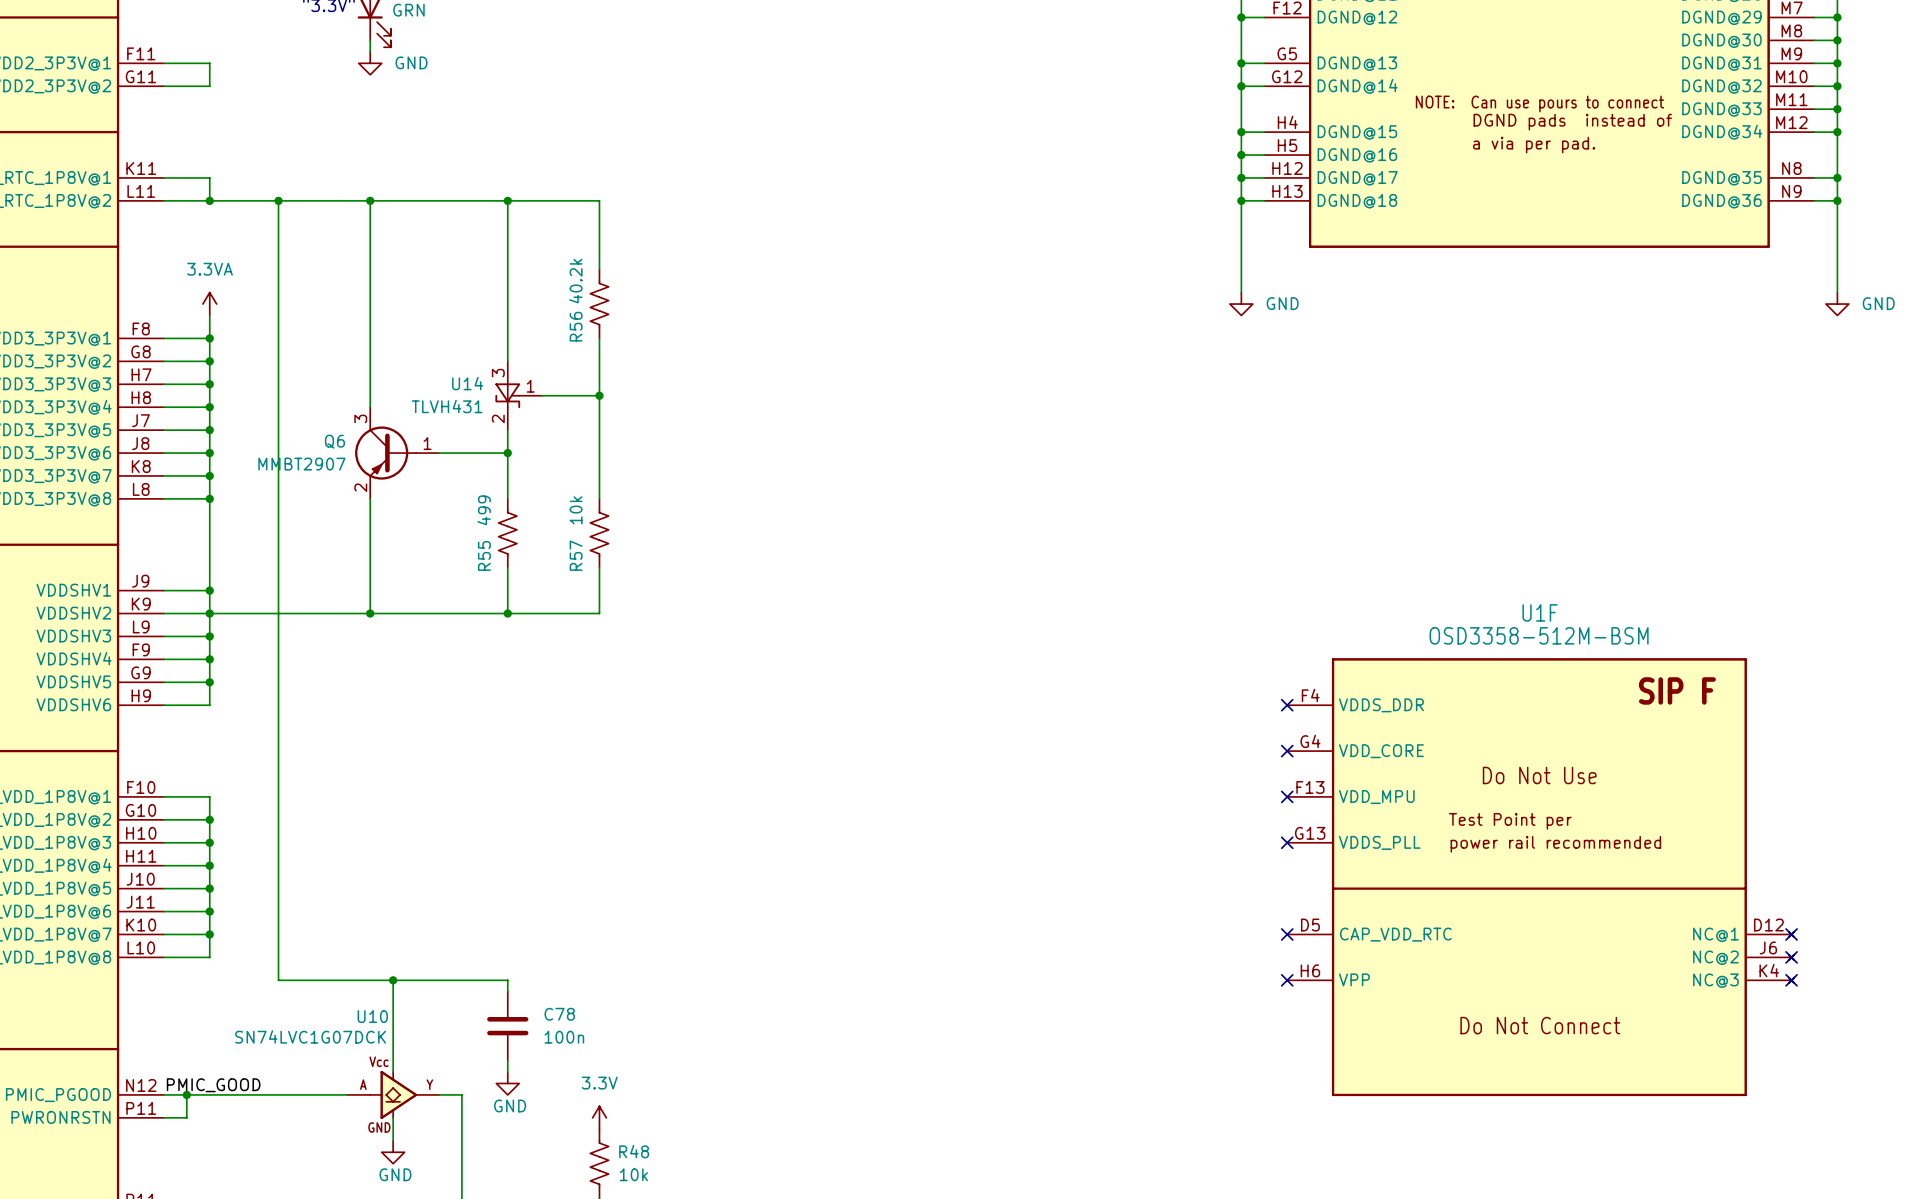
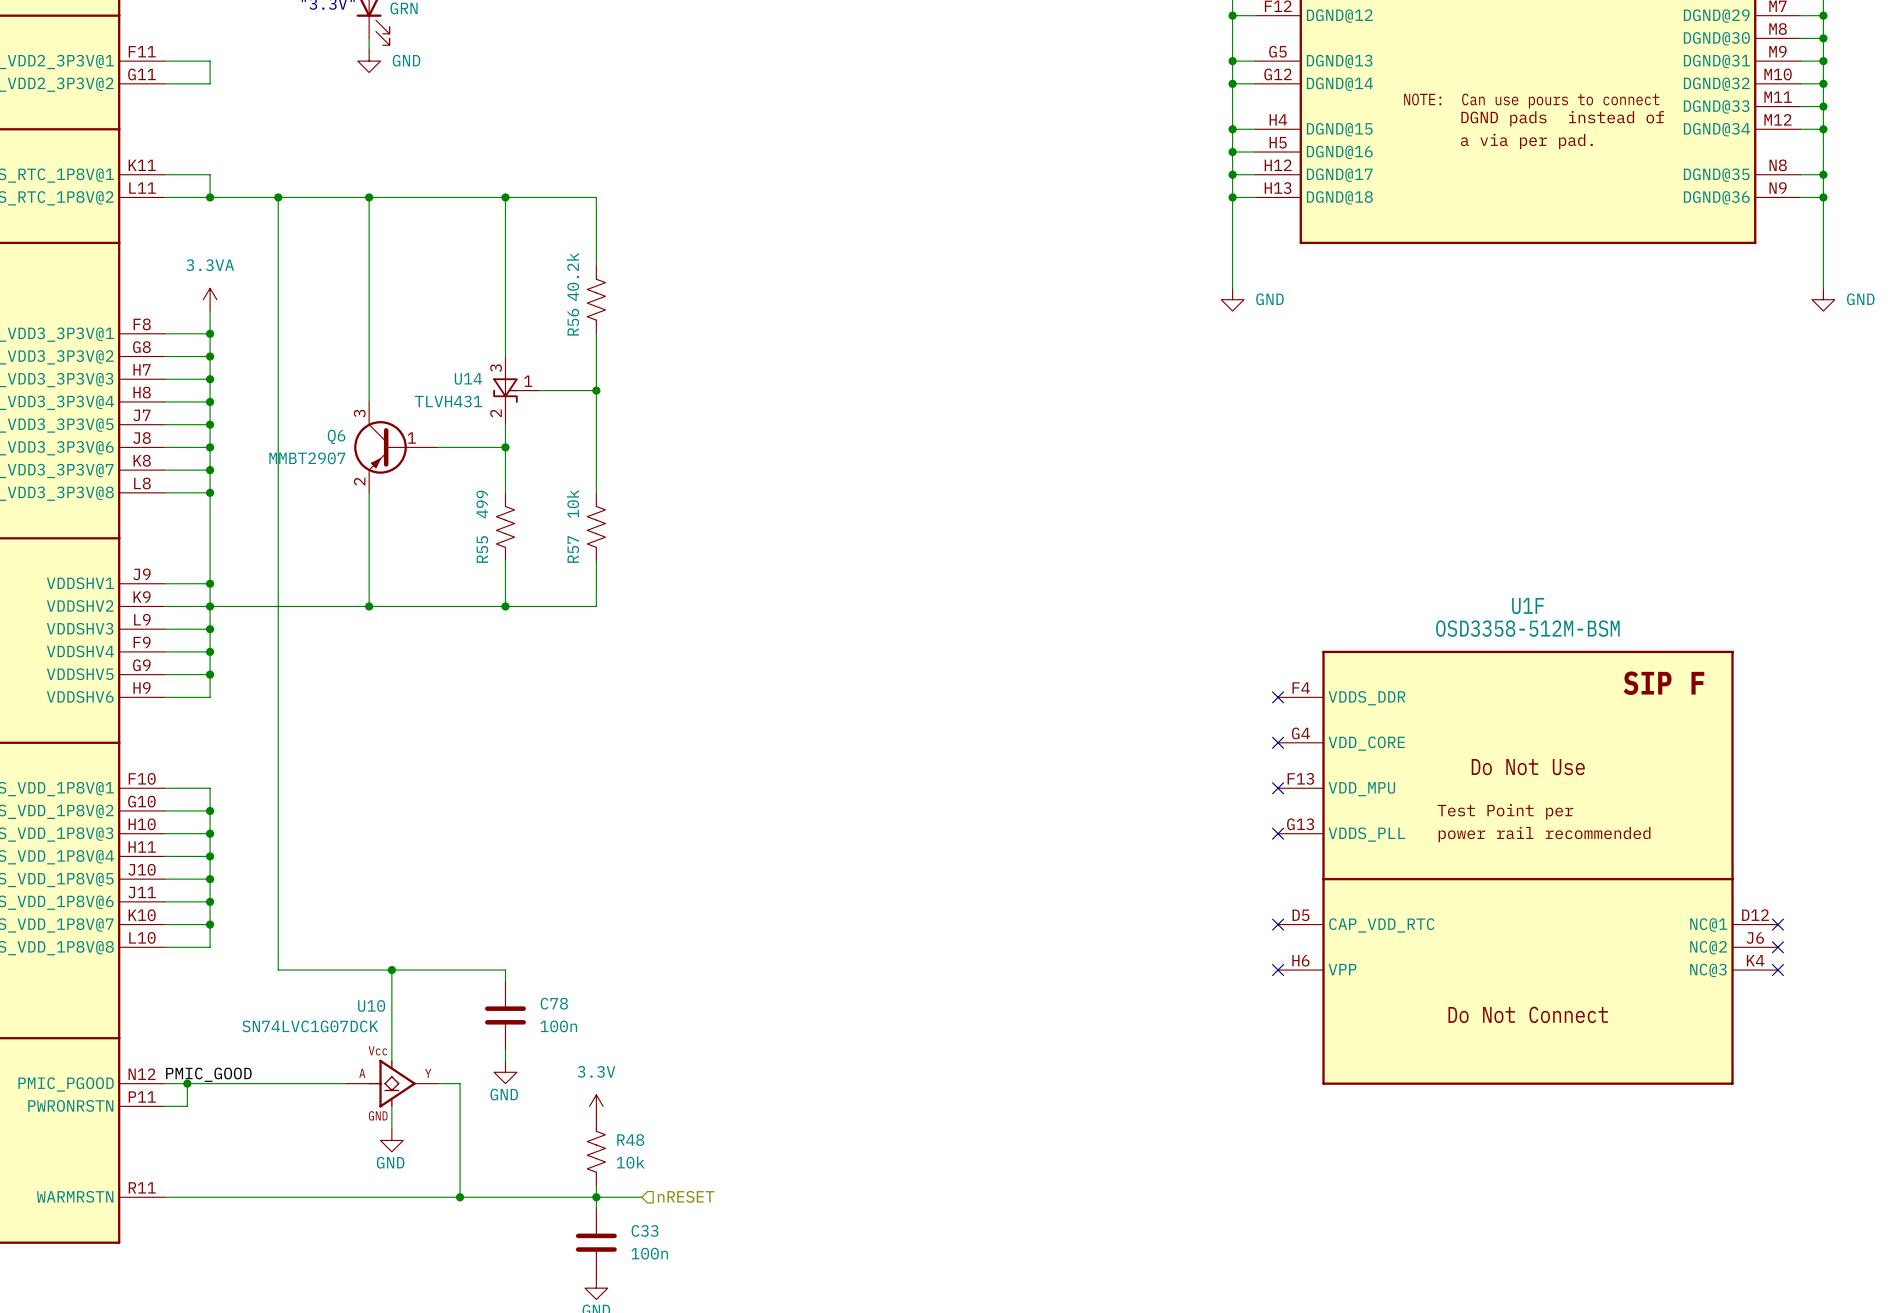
Q6 symbol: [355, 407, 439, 499] -> [354, 401, 438, 493]
U1F symbol: [1287, 658, 1795, 1097] -> [1278, 650, 1778, 1085]
U10 symbol: [347, 1070, 439, 1120] -> [346, 1059, 438, 1108]

